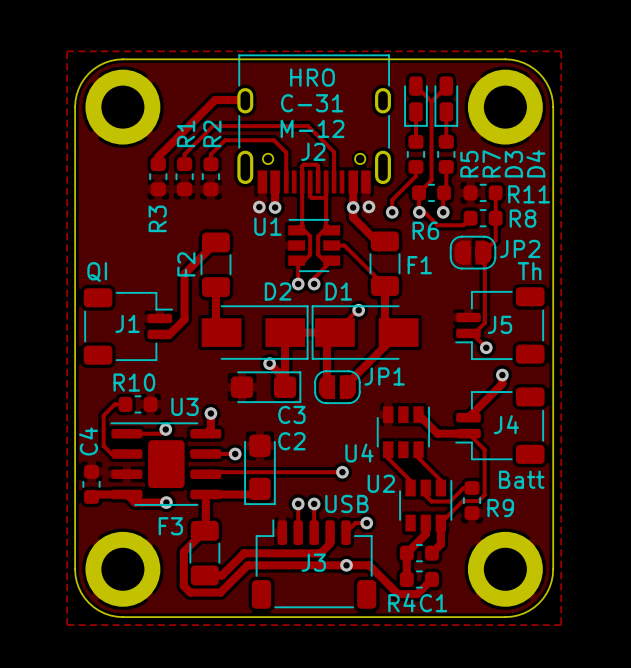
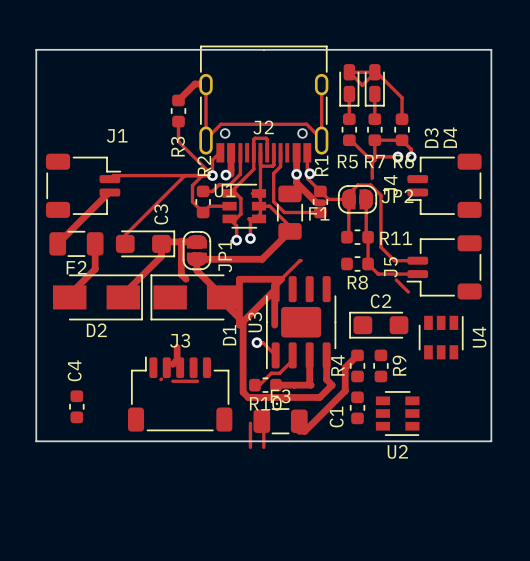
zone outline: (67, 51) (67, 625) (561, 625) (561, 51) (67, 51) -> none
board edge: (122, 59) (104, 62) (89, 73) (78, 88) (75, 107) (75, 575) (81, 593) (89, 603) (104, 613) (122, 617) (505, 617) (517, 615) (529, 610) (543, 598) (551, 581) (553, 569) (552, 100) (546, 83) (539, 73) (523, 62) (505, 59) -> (103, 49) (36, 49) (36, 441) (491, 441) (491, 49) (424, 49)
text: HRO (312, 77) -> none
track: none -> (351, 72) (376, 72) (402, 97) (402, 119)
track: (232, 100) (215, 100) (158, 156) (158, 164) -> (194, 84) (178, 100)
track: none -> (206, 84) (206, 139)
track: none -> (321, 84) (321, 139)
track: (431, 101) (431, 180) (418, 192) (419, 212) -> none
text: C-31 (312, 103) -> none
part: (122, 107) -> none
part: (505, 107) -> none
text: M-12 (312, 128) -> none
track: none -> (178, 121) (178, 141) (212, 175)
R7 name rotation: 0° (491, 163) -> 90° clockwise (375, 161)
R7 name position: R7 (491, 163) -> R7 (375, 161)
track: (184, 164) (184, 154) (212, 126) (308, 126) (334, 152) (334, 181) -> (320, 212) (284, 212) (273, 201) (273, 173) (280, 166) (280, 152)
track: (210, 164) (210, 154) (225, 140) (273, 140) (286, 152) (286, 181) -> (203, 191) (212, 191) (219, 184) (229, 184) (240, 174) (240, 152)
R5 name rotation: 0° (469, 164) -> 90° clockwise (347, 161)
R5 name position: R5 (469, 164) -> R5 (347, 161)
track: none -> (206, 139) (221, 124) (306, 124) (321, 139)
track: (415, 166) (415, 176) (392, 199) (392, 212) -> none
track: none -> (351, 140) (367, 156) (397, 156)
track: none -> (376, 140) (402, 140) (411, 149) (411, 156)
R3 position: (158, 176) -> (178, 111)
R1 position: (184, 176) -> (320, 201)
R2 position: (210, 176) -> (203, 201)
track: none -> (220, 152) (212, 160) (212, 175)
track: none -> (307, 152) (307, 178) (328, 199) (348, 199)
via: none -> (397, 156)
via: none -> (411, 156)
R6 rotation: 0° (431, 192) -> 90° clockwise (402, 129)
R6 position: (431, 192) -> (402, 129)
R11 position: (483, 192) -> (357, 237)
track: (495, 192) (495, 240) (483, 252) (484, 322) (474, 333) (467, 333) -> none
track: none -> (260, 164) (260, 192) (255, 193)
track: (326, 196) (326, 224) (331, 230) (324, 230) (318, 236) (318, 254) (324, 260) (331, 260) (314, 278) (314, 284) -> none
track: (302, 201) (302, 224) (296, 230) (300, 230) -> (253, 169) (229, 193) (235, 193) (240, 198) (240, 213) (235, 218) (229, 218) (236, 225) (236, 240)
track: (418, 206) (437, 225) (463, 225) (470, 218) -> none
via: (259, 207) -> none
via: (275, 207) -> none
via: none -> (225, 175)
track: none -> (184, 175) (125, 235) (125, 243)
track: none -> (202, 175) (192, 185) (192, 201) (203, 212) (209, 206) (229, 206)
track: none -> (212, 175) (113, 175) (109, 179)
via: none -> (212, 175)
via: (392, 212) -> none
via: (419, 212) -> none
via: (443, 212) -> none
R8 position: (483, 218) -> (357, 263)
R8 name position: R8 (523, 218) -> R8 (357, 282)
track: none -> (109, 192) (57, 243)
track: none -> (366, 199) (368, 263) (378, 274) (417, 274)
track: (215, 242) (184, 273) (184, 319) (169, 334) (159, 334) -> none
track: none -> (259, 206) (269, 206) (290, 226) (290, 231) (262, 259) (196, 259) (196, 270) (223, 297)
U1 position: (314, 245) -> (244, 206)
track: (331, 245) (344, 245) (384, 286) (384, 318) (398, 332) (347, 383) (347, 387) -> none
JP2 position: (473, 252) -> (357, 199)
F1 position: (384, 263) -> (290, 212)
F2 name position: F2 (186, 264) -> F2 (76, 267)
F2 rotation: 0° (215, 264) -> 90° clockwise (76, 243)
F2 position: (215, 264) -> (76, 243)
text: QI (97, 271) -> none
text: Th (529, 271) -> none
track: none -> (346, 237) (348, 235) (348, 194) (357, 185) (370, 185) (380, 195) (380, 247) (394, 260) (417, 260)
via position: (314, 284) -> (236, 240)
track: none -> (196, 241) (163, 241) (161, 243) (161, 256) (123, 294)
track: none -> (95, 243) (95, 269) (69, 294)
D2 name position: D2 (278, 291) -> D2 (96, 330)
D1 name rotation: 0° (338, 291) -> 90° counterclockwise (229, 335)
D1 name position: D1 (338, 291) -> D1 (229, 335)
via: (358, 310) -> none
J1 name position: J1 (127, 323) -> J1 (117, 135)
J5 name rotation: 0° (499, 324) -> 90° counterclockwise (390, 267)
J5 position: (499, 325) -> (444, 267)
J1 position: (128, 326) -> (83, 185)
D2 position: (255, 332) -> (97, 297)
D1 position: (365, 332) -> (195, 297)
track: none -> (275, 289) (243, 321) (243, 392) (248, 397) (319, 397) (332, 385) (326, 379) (326, 355)
via: (486, 347) -> none
via: (269, 363) -> none
track: (502, 375) (502, 383) (468, 417) -> none
via: (502, 375) -> none
R10 name position: R10 (134, 382) -> R10 (265, 403)
C3 position: (266, 387) -> (145, 243)
JP1 rotation: 0° (337, 387) -> 90° clockwise (196, 250)
JP1 position: (337, 387) -> (196, 250)
track: (125, 404) (114, 404) (103, 415) (103, 445) (111, 453) (121, 453) -> none
R10 position: (138, 404) -> (265, 385)
track: none -> (256, 342) (262, 342) (275, 355)
via: none -> (256, 342)
via: (210, 413) -> none
C3 name rotation: 0° (291, 414) -> 90° counterclockwise (161, 214)
C3 name position: C3 (291, 414) -> C3 (161, 214)
track: (418, 414) (437, 433) (468, 433) (484, 449) (484, 495) (478, 501) (462, 501) (440, 523) (440, 544) (431, 553) -> none
track: none -> (292, 355) (292, 360) (279, 373) (271, 373) (259, 385) (254, 385)
track: none -> (309, 355) (311, 385) (276, 385)
track: none -> (357, 355) (345, 367) (345, 390) (304, 431) (299, 431)
J4 name rotation: 0° (506, 424) -> 90° counterclockwise (390, 185)
J4 name position: J4 (506, 424) -> J4 (390, 185)
J4 position: (499, 425) -> (444, 185)
via: (165, 429) -> none
U4 position: (403, 432) -> (441, 337)
track: (126, 433) (161, 433) -> none
track: (388, 449) (388, 458) (410, 480) (410, 488) -> none
track: (418, 449) (418, 458) (440, 480) (440, 488) -> none
via: (235, 453) -> none
U4 name rotation: 0° (359, 453) -> 90° counterclockwise (479, 337)
U4 name position: U4 (359, 453) -> U4 (479, 337)
U3 rotation: 0° (165, 464) -> 90° counterclockwise (301, 322)
U3 position: (165, 464) -> (301, 322)
C2 rotation: 0° (259, 469) -> 90° clockwise (378, 325)
C2 position: (259, 469) -> (378, 325)
track: (342, 472) (207, 472) (205, 474) -> none
via: (342, 472) -> none
text: Batt (521, 479) -> none
U2 name position: U2 (381, 483) -> U2 (397, 451)
track: (259, 488) (254, 494) (205, 494) (205, 529) (183, 551) (183, 586) (190, 592) (220, 592) (247, 565) (369, 565) (398, 594) (417, 594) (431, 579) -> none
track: (425, 488) (425, 495) (431, 501) (450, 501) (463, 487) (472, 487) -> none
track: (91, 496) (93, 494) (126, 494) (135, 502) (166, 502) -> none
R9 position: (472, 500) -> (380, 365)
via: (166, 502) -> none
via: (298, 503) -> none
via: (314, 503) -> none
text: USB (346, 504) -> none
U2 rotation: 0° (425, 505) -> 90° clockwise (397, 413)
U2 position: (425, 505) -> (397, 413)
R9 name rotation: 0° (500, 508) -> 90° counterclockwise (399, 365)
track: (366, 523) (355, 523) (346, 532) -> none
via: (366, 523) -> none
track: (425, 523) (425, 534) (406, 553) (406, 579) -> none
track: (330, 532) (330, 543) (320, 553) (244, 553) (221, 575) (204, 575) -> none
F3 rotation: 0° (204, 553) -> 90° clockwise (280, 421)
F3 position: (204, 553) -> (280, 421)
C1 rotation: 0° (419, 553) -> 90° clockwise (357, 407)
C1 position: (419, 553) -> (357, 407)
J3 name position: J3 (313, 562) -> J3 (180, 340)
J3 position: (314, 564) -> (180, 394)
via: (346, 565) -> none
part: (122, 569) -> none
part: (505, 569) -> none
R4 rotation: 0° (419, 579) -> 90° clockwise (357, 365)
R4 position: (419, 579) -> (357, 365)

